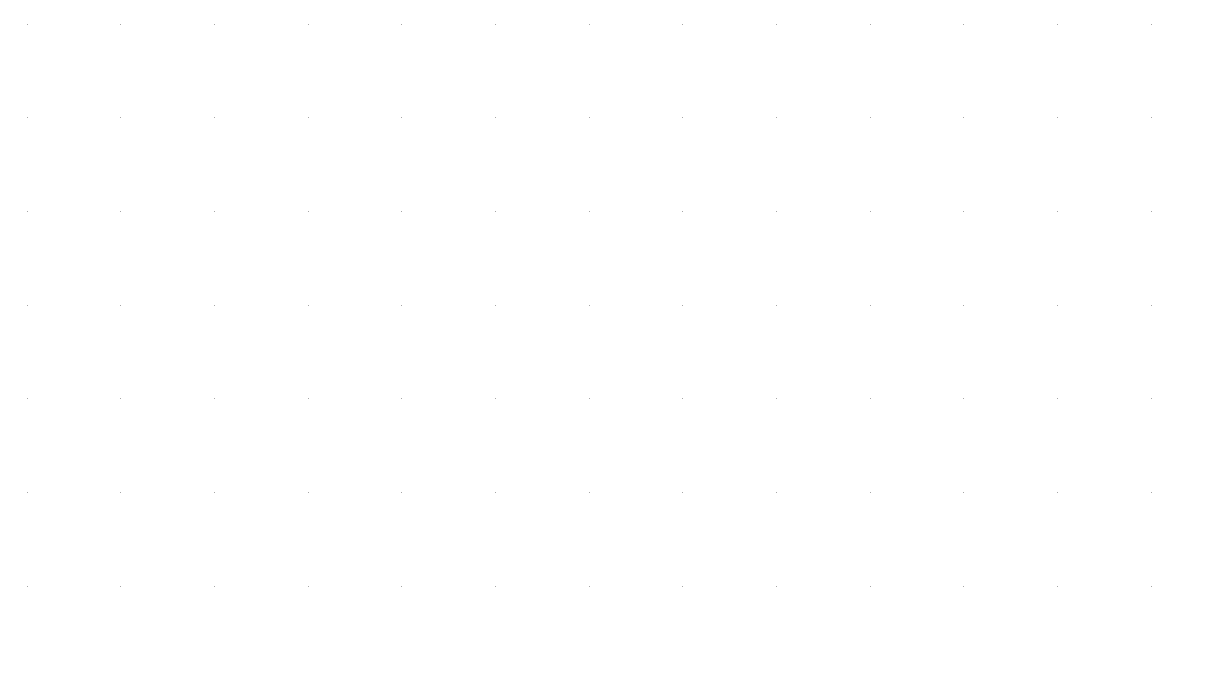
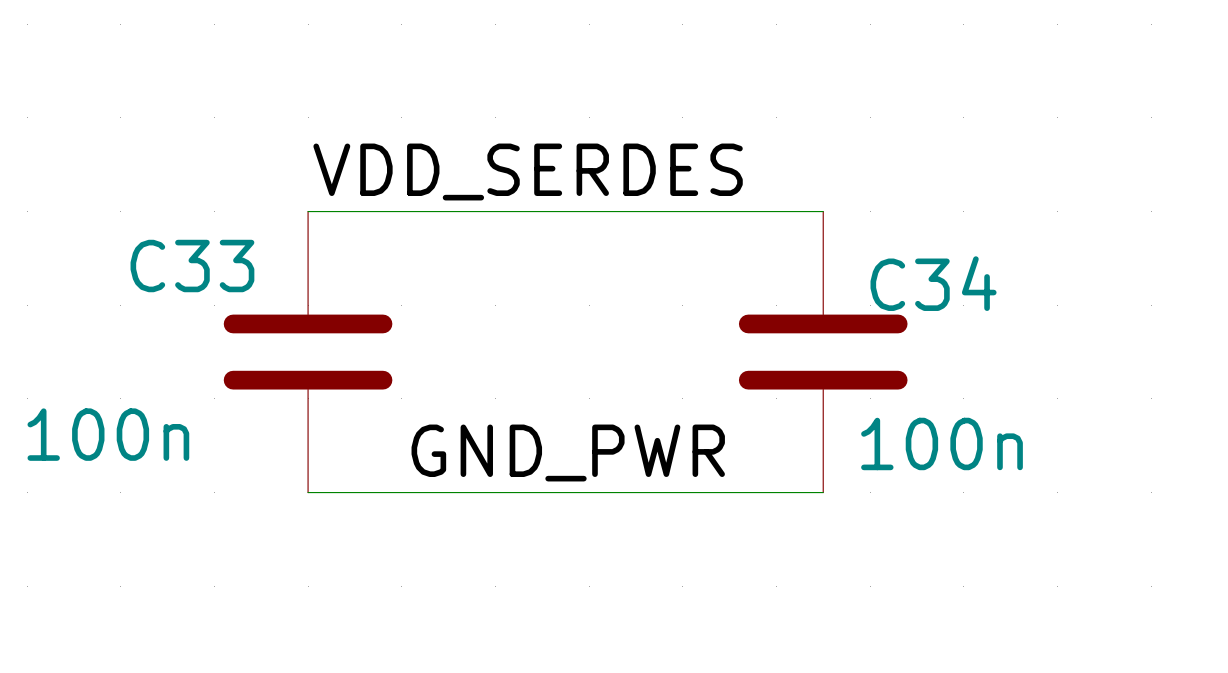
label: none -> VDD_SERDES (528, 171)
wire: none -> (308, 211) (823, 211)
C33: none -> 100n (308, 352)
C34: none -> 100n (823, 352)
label: none -> GND_PWR (568, 453)
wire: none -> (308, 492) (823, 492)

